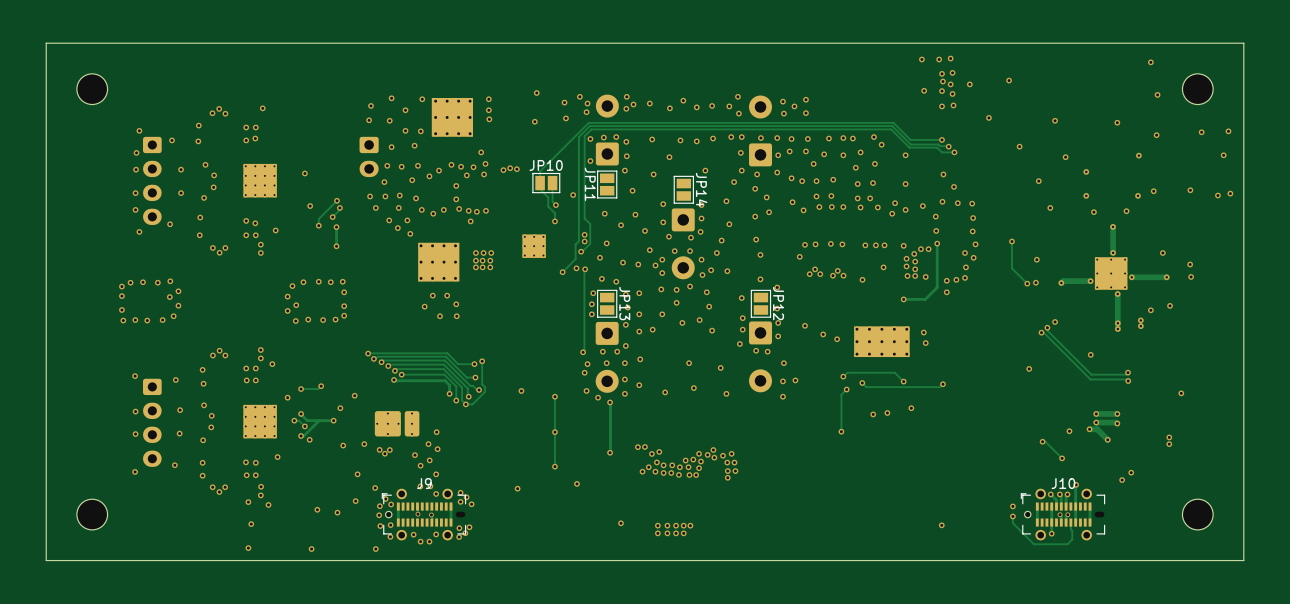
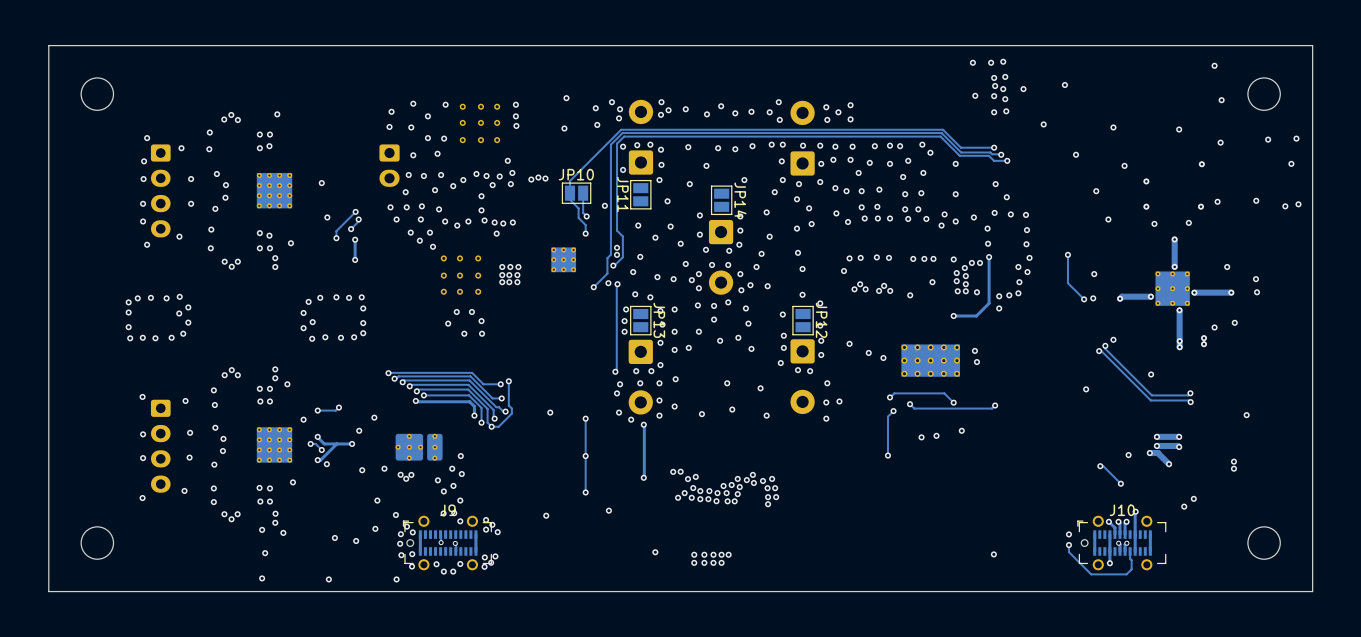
part footprint: [431, 97, 474, 137] -> [459, 103, 501, 144]
part footprint: [418, 242, 460, 282] -> [440, 255, 482, 295]

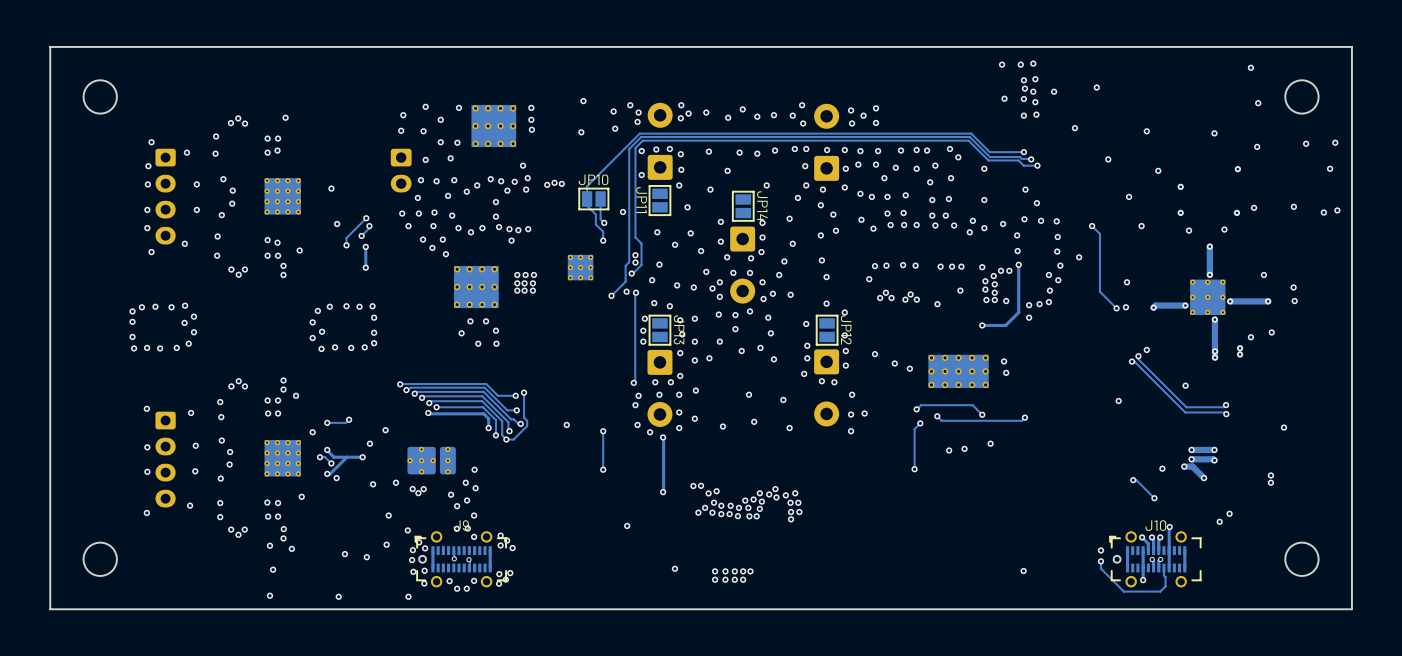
part footprint: [459, 103, 501, 144] -> [471, 104, 517, 148]
track: none -> (1092, 226) (1099, 233) (1099, 262)
via: none -> (1092, 226)
via: none -> (1079, 257)
via: (1067, 254) -> none
part footprint: [440, 255, 482, 295] -> [453, 265, 499, 309]
track: (585, 456) (585, 492) -> none
via: (585, 492) -> none
via: (546, 515) -> none

